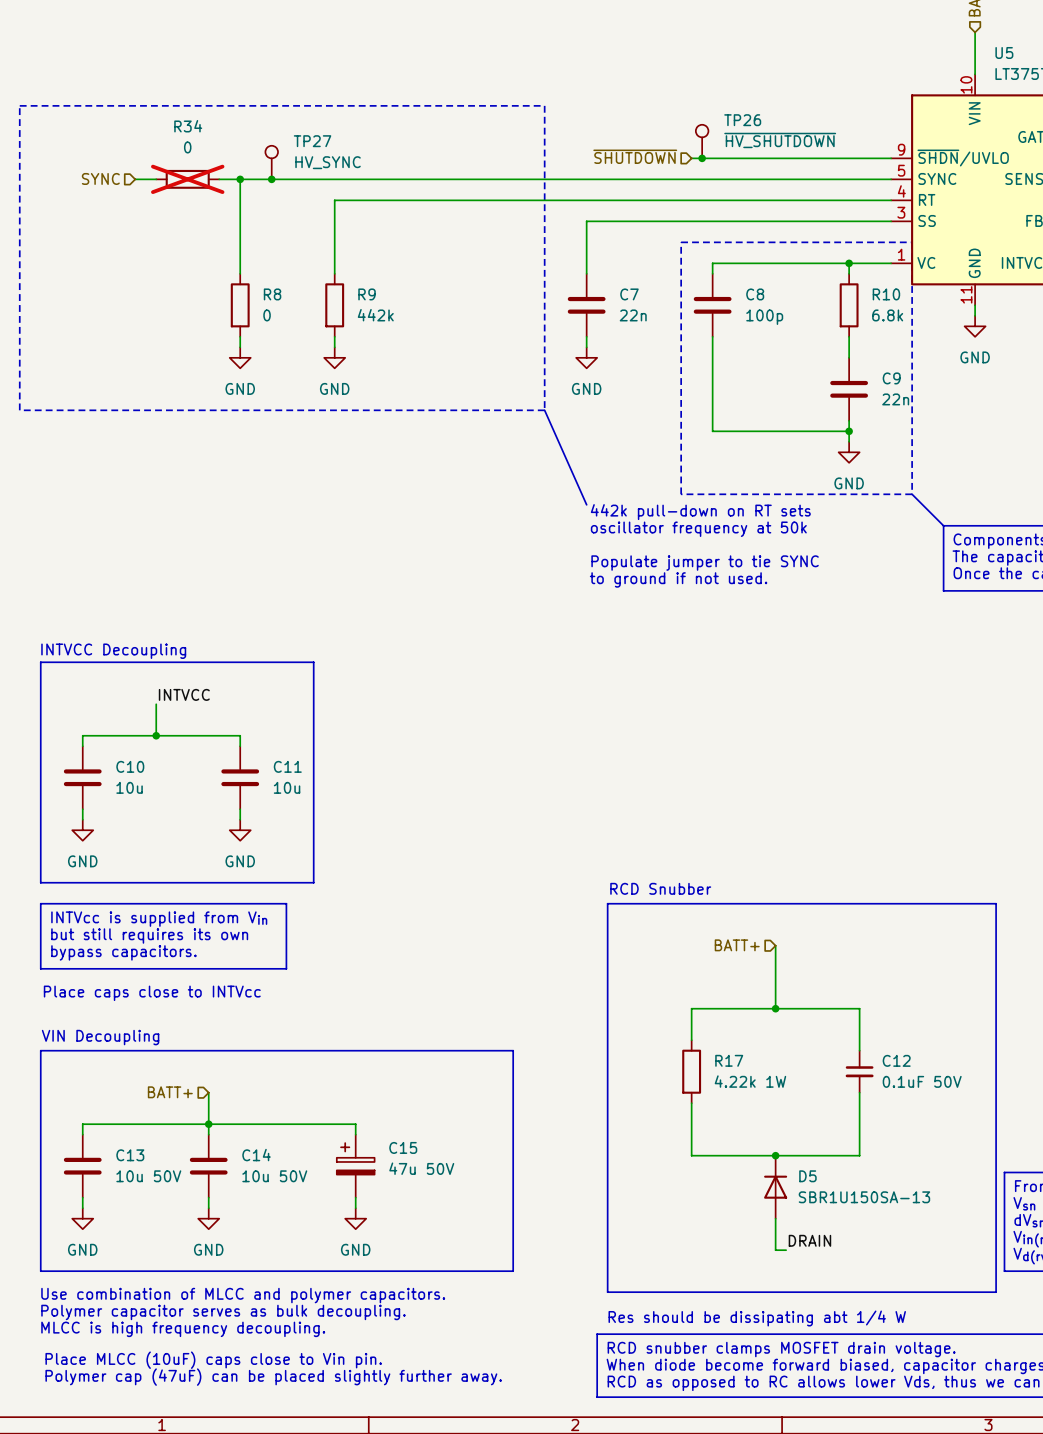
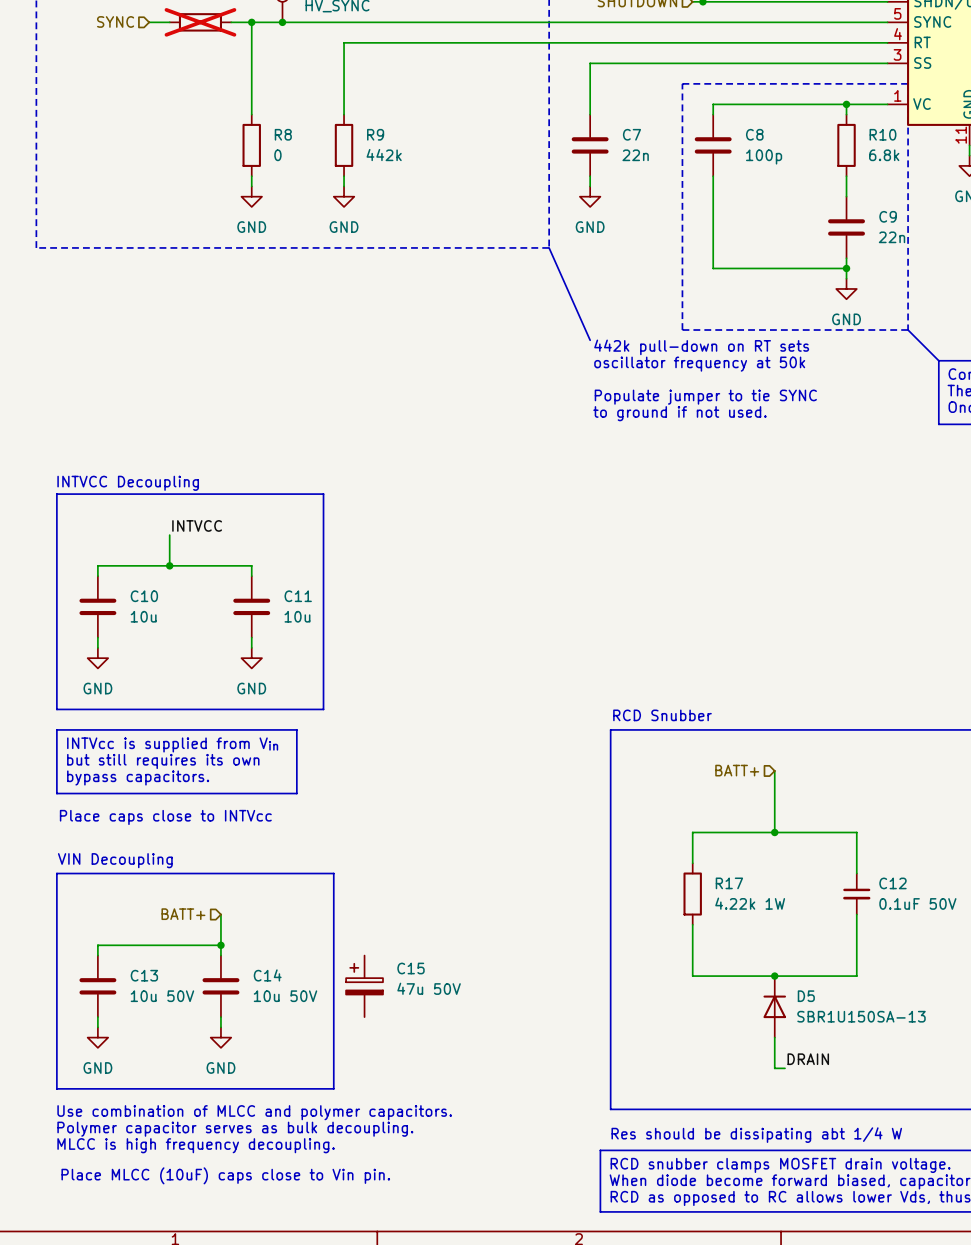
line: (324, 1050) (513, 1050) (513, 1271) (324, 1271) -> (333, 873) (333, 1088)
wire: (208, 1124) (355, 1124) (355, 1134) -> none
wire: (355, 1197) (355, 1208) -> none
power symbol: GND (355, 1218) -> none
text: Polymer cap (47uF) can be placed slightly further away. (273, 1377) -> none

